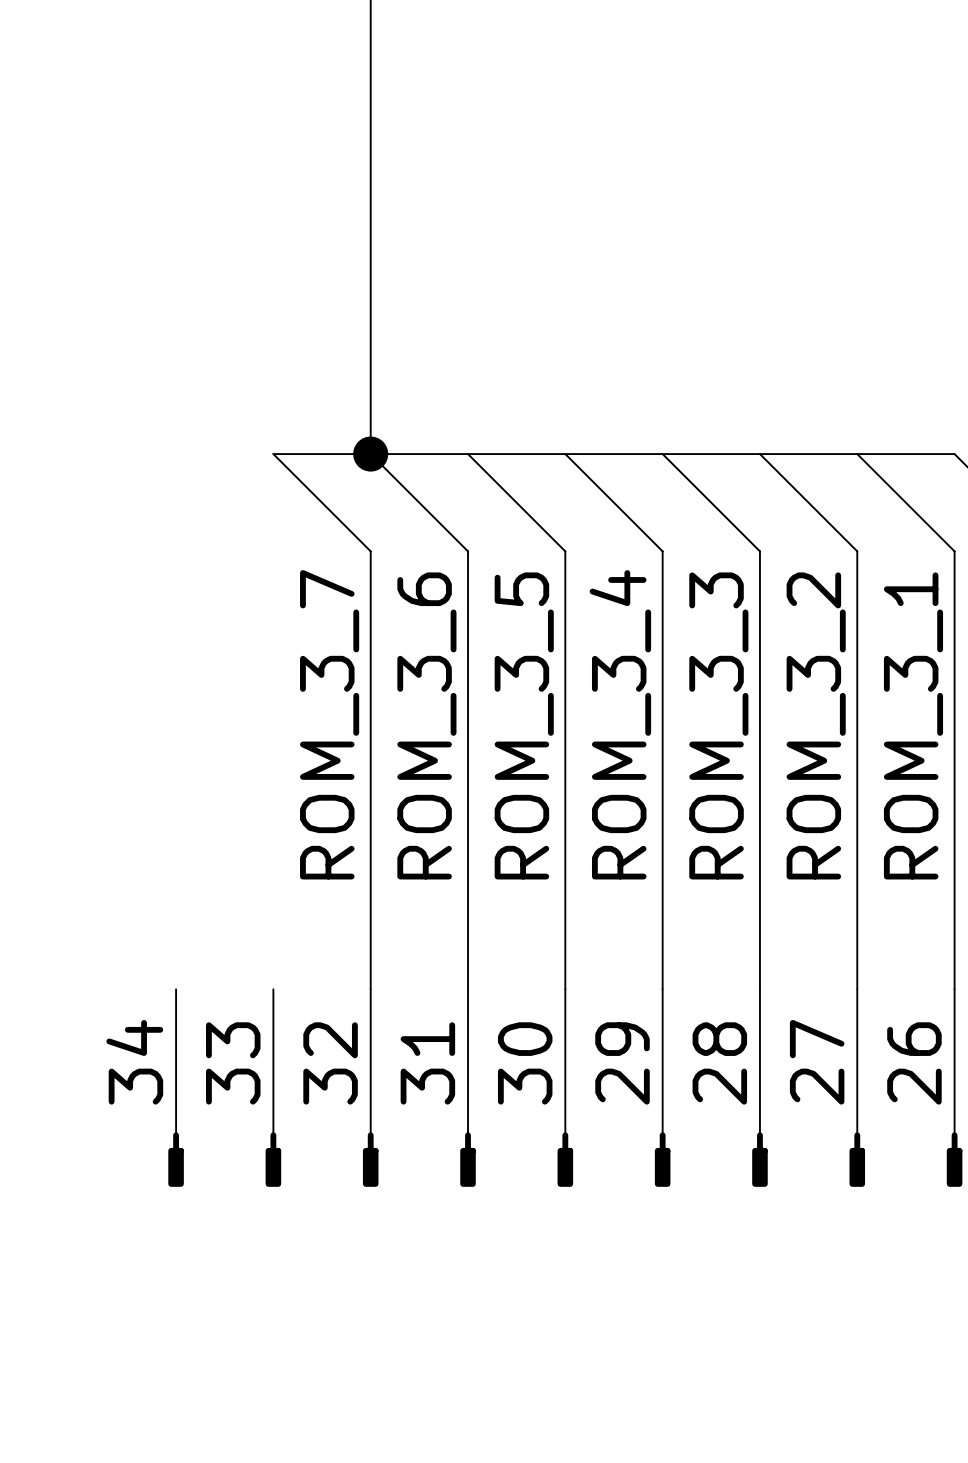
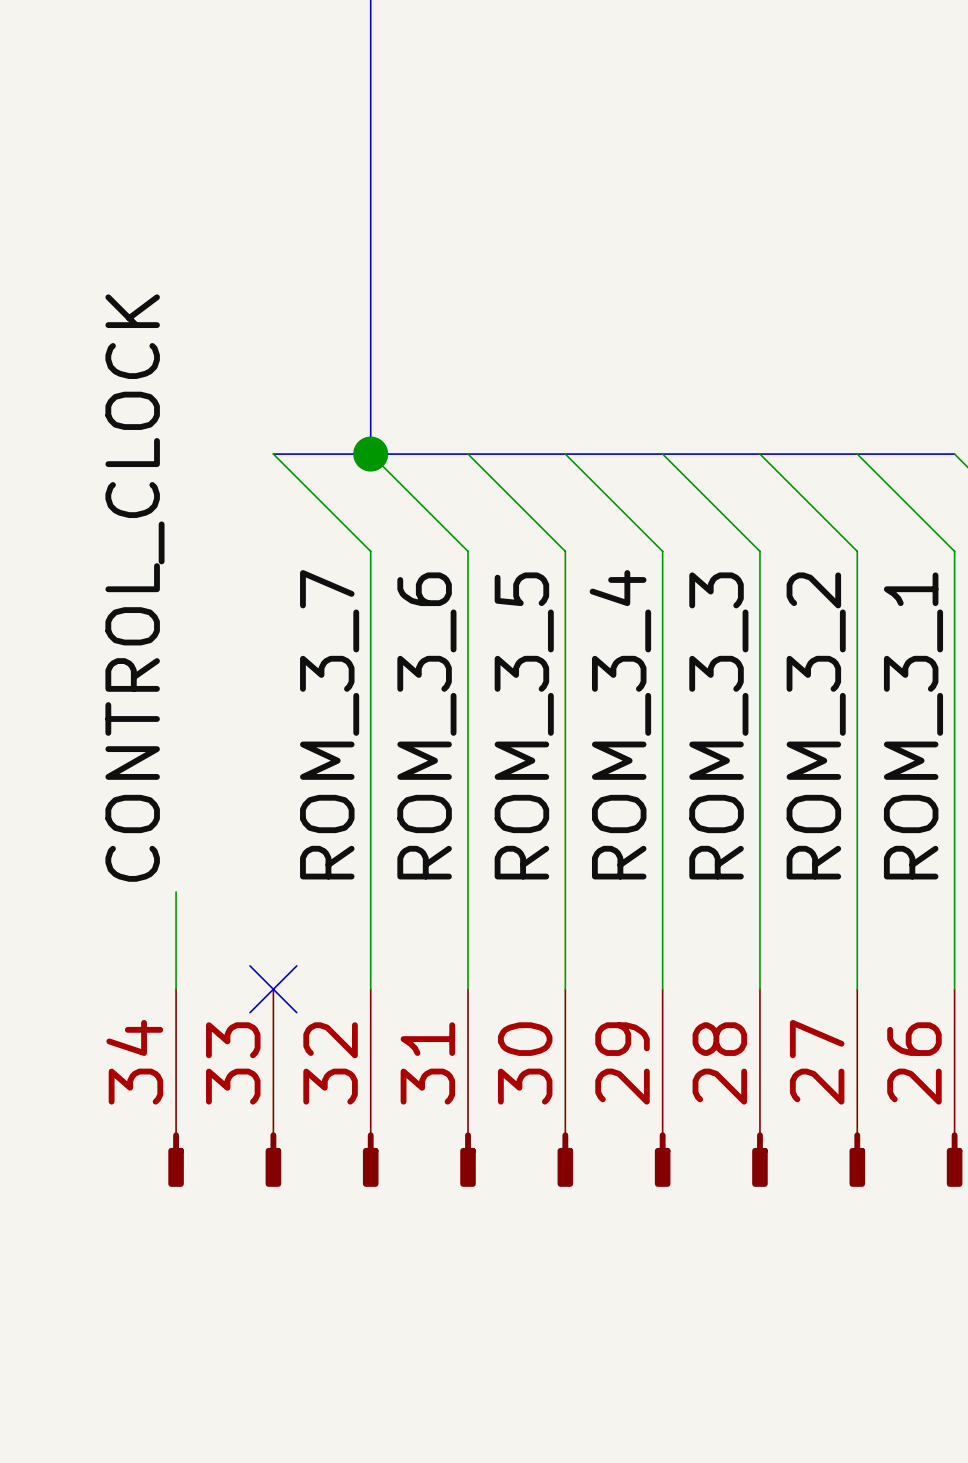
label: none -> CONTROL_CLOCK (134, 588)
wire: none -> (176, 891) (176, 989)
no-connect mark: none -> (273, 989)

